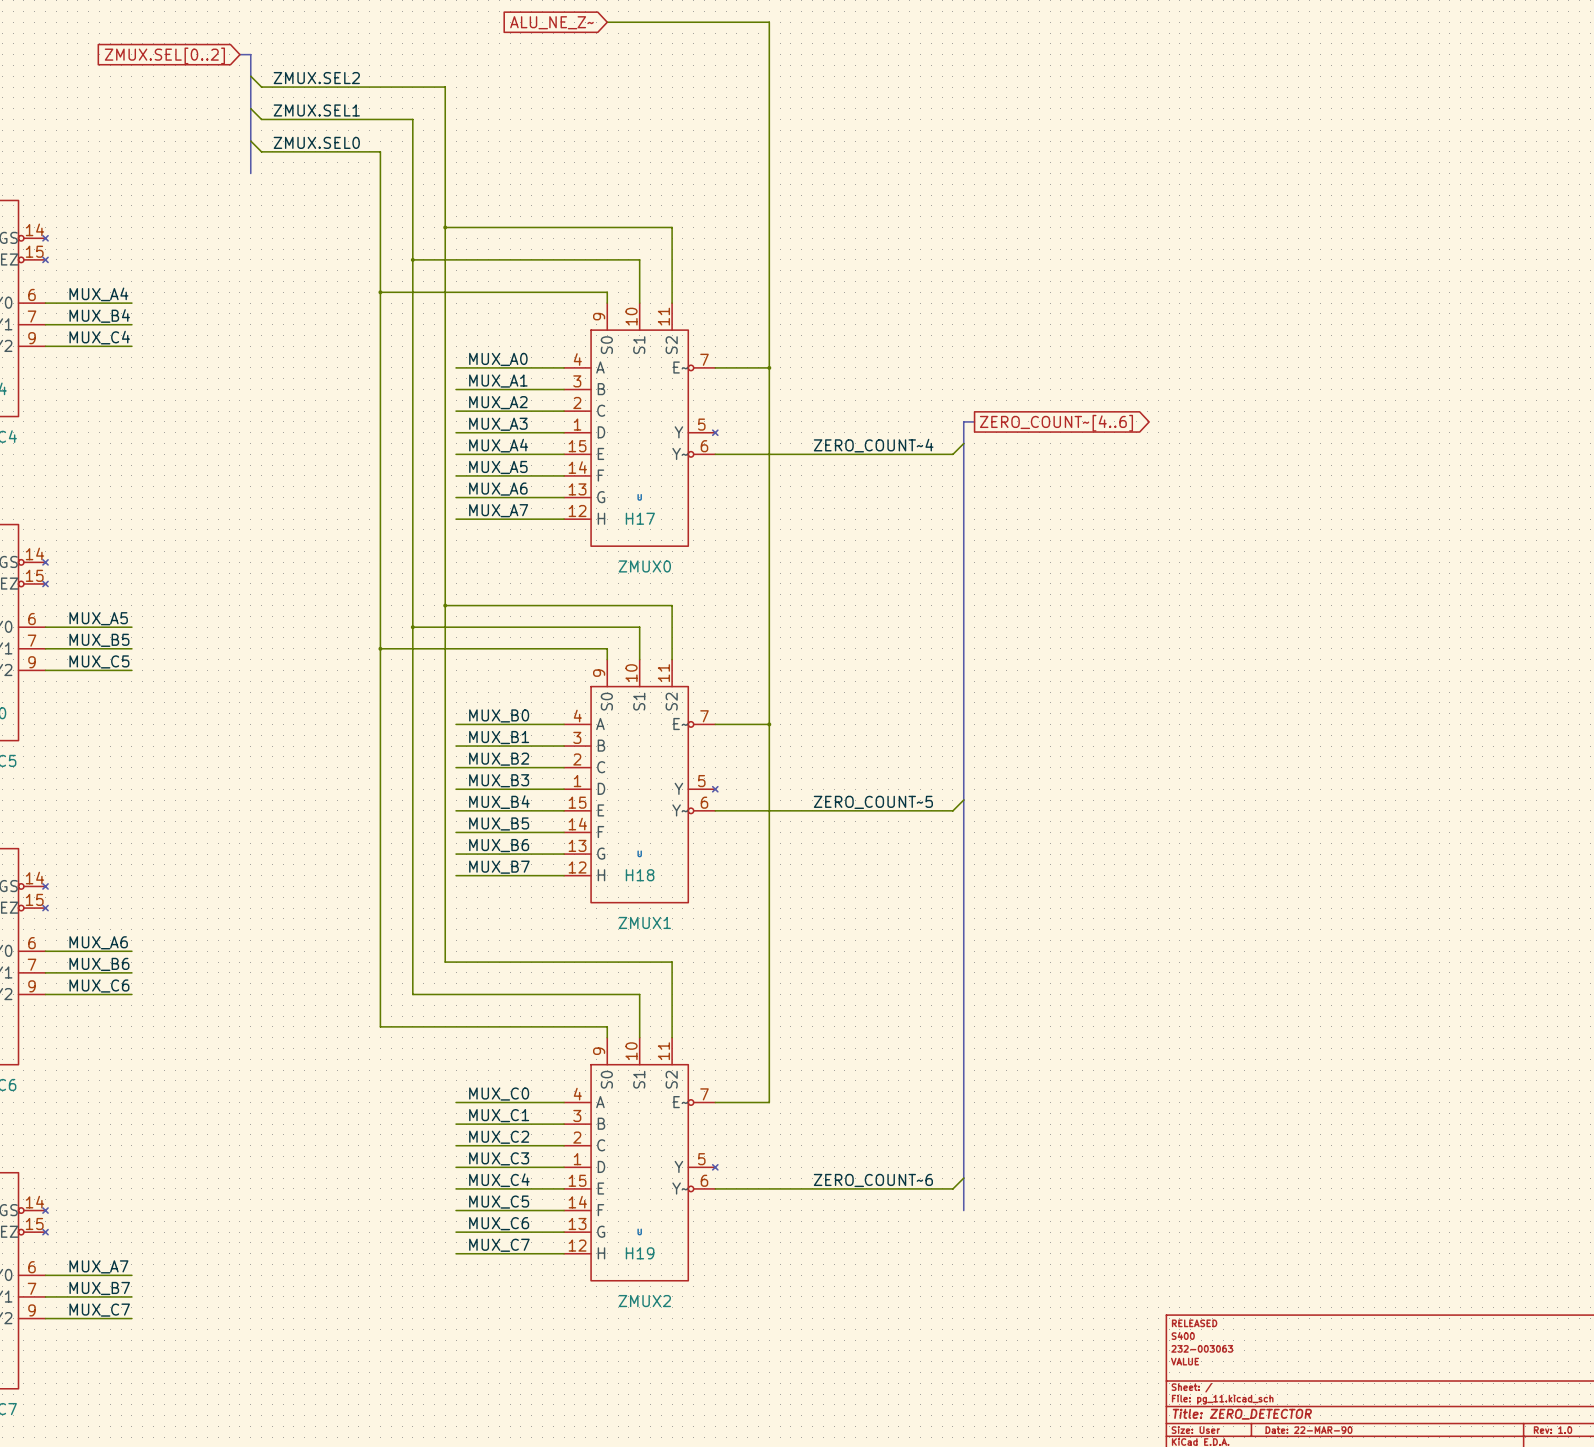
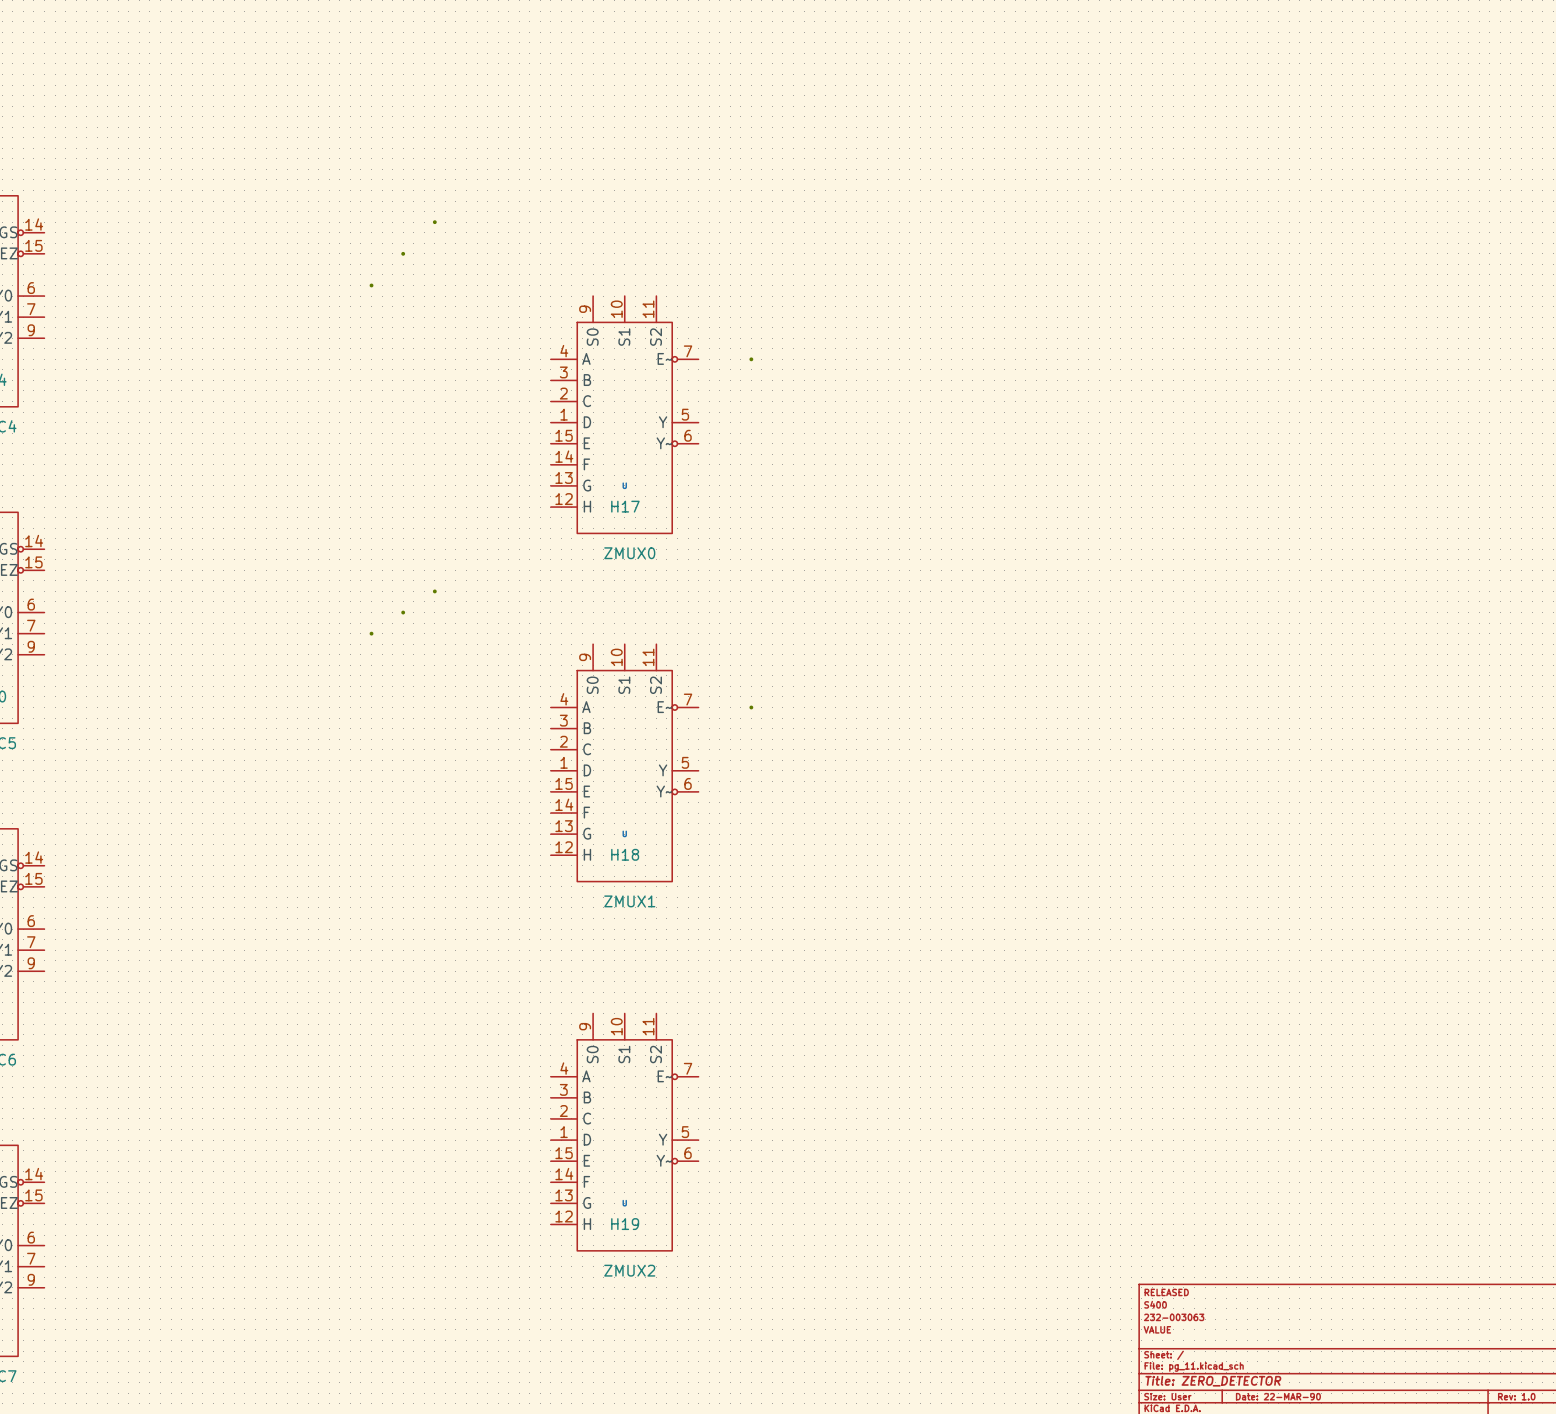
global label: ALU_NE_Z~ (551, 22) -> none
wire: (607, 22) (769, 22) (769, 1102) (715, 1102) -> none
bus: (239, 54) (250, 54) (250, 173) -> none
global label: ZMUX.SEL[0..2] (164, 55) -> none
wire: (250, 76) (261, 87) (445, 87) (445, 962) (672, 962) (672, 1037) -> none
label: ZMUX.SEL2 (316, 78) -> none
wire: (250, 108) (261, 119) (412, 119) (412, 994) (639, 994) (639, 1037) -> none
label: ZMUX.SEL1 (316, 110) -> none
wire: (250, 141) (261, 151) (380, 151) (380, 1026) (607, 1026) (607, 1037) -> none
label: ZMUX.SEL0 (316, 142) -> none
wire: (445, 227) (672, 227) (672, 303) -> none
no-connect mark: (45, 238) -> none
no-connect mark: (45, 259) -> none
wire: (412, 259) (639, 259) (639, 303) -> none
wire: (380, 292) (607, 292) (607, 303) -> none
label: MUX_A4 (98, 294) -> none
wire: (45, 303) (131, 303) -> none
label: MUX_B4 (99, 315) -> none
wire: (45, 324) (131, 324) -> none
label: MUX_C4 (99, 337) -> none
wire: (45, 346) (131, 346) -> none
label: MUX_A0 (498, 359) -> none
wire: (456, 367) (564, 367) -> none
wire: (715, 367) (769, 367) -> none
label: MUX_A1 (498, 381) -> none
wire: (456, 389) (564, 389) -> none
label: MUX_A2 (498, 402) -> none
wire: (456, 411) (564, 411) -> none
bus: (974, 421) (963, 421) (963, 1210) -> none
global label: ZERO_COUNT~[4..6] (1056, 423) -> none
label: MUX_A3 (498, 424) -> none
wire: (456, 432) (564, 432) -> none
no-connect mark: (715, 432) -> none
wire: (963, 443) (952, 454) (715, 454) -> none
label: MUX_A4 (498, 445) -> none
label: ZERO_COUNT~4 (873, 445) -> none
wire: (456, 454) (564, 454) -> none
label: MUX_A5 (498, 467) -> none
wire: (456, 475) (564, 475) -> none
label: MUX_A6 (498, 489) -> none
wire: (456, 497) (564, 497) -> none
label: MUX_A7 (498, 510) -> none
wire: (456, 519) (564, 519) -> none
no-connect mark: (45, 562) -> none
no-connect mark: (45, 583) -> none
wire: (445, 605) (672, 605) (672, 659) -> none
label: MUX_A5 (98, 618) -> none
wire: (45, 627) (131, 627) -> none
wire: (412, 627) (639, 627) (639, 659) -> none
label: MUX_B5 (99, 640) -> none
wire: (45, 648) (131, 648) -> none
wire: (380, 648) (607, 648) (607, 659) -> none
label: MUX_C5 (99, 661) -> none
wire: (45, 670) (131, 670) -> none
label: MUX_B0 (499, 715) -> none
wire: (456, 724) (564, 724) -> none
wire: (715, 724) (769, 724) -> none
label: MUX_B1 (499, 737) -> none
wire: (456, 746) (564, 746) -> none
label: MUX_B2 (499, 759) -> none
wire: (456, 767) (564, 767) -> none
label: MUX_B3 (499, 780) -> none
wire: (456, 789) (564, 789) -> none
no-connect mark: (715, 789) -> none
wire: (963, 800) (952, 810) (715, 810) -> none
label: MUX_B4 (499, 802) -> none
label: ZERO_COUNT~5 (873, 802) -> none
wire: (456, 810) (564, 810) -> none
label: MUX_B5 (499, 823) -> none
wire: (456, 832) (564, 832) -> none
label: MUX_B6 (499, 845) -> none
wire: (456, 854) (564, 854) -> none
label: MUX_B7 (499, 867) -> none
wire: (456, 875) (564, 875) -> none
no-connect mark: (45, 886) -> none
no-connect mark: (45, 908) -> none
label: MUX_A6 (98, 942) -> none
wire: (45, 951) (131, 951) -> none
label: MUX_B6 (99, 964) -> none
wire: (45, 972) (131, 972) -> none
label: MUX_C6 (99, 986) -> none
wire: (45, 994) (131, 994) -> none
label: MUX_C0 (499, 1094) -> none
wire: (456, 1102) (564, 1102) -> none
label: MUX_C1 (499, 1115) -> none
wire: (456, 1124) (564, 1124) -> none
label: MUX_C2 (499, 1137) -> none
wire: (456, 1145) (564, 1145) -> none
label: MUX_C3 (499, 1158) -> none
wire: (456, 1167) (564, 1167) -> none
no-connect mark: (715, 1167) -> none
wire: (963, 1178) (952, 1188) (715, 1188) -> none
label: MUX_C4 (499, 1180) -> none
label: ZERO_COUNT~6 (873, 1180) -> none
wire: (456, 1188) (564, 1188) -> none
label: MUX_C5 (499, 1202) -> none
no-connect mark: (45, 1210) -> none
wire: (456, 1210) (564, 1210) -> none
label: MUX_C6 (499, 1223) -> none
no-connect mark: (45, 1232) -> none
wire: (456, 1232) (564, 1232) -> none
label: MUX_C7 (499, 1245) -> none
wire: (456, 1253) (564, 1253) -> none
label: MUX_A7 (98, 1266) -> none
wire: (45, 1275) (131, 1275) -> none
label: MUX_B7 (99, 1288) -> none
wire: (45, 1296) (131, 1296) -> none
label: MUX_C7 (99, 1310) -> none
wire: (45, 1318) (131, 1318) -> none

